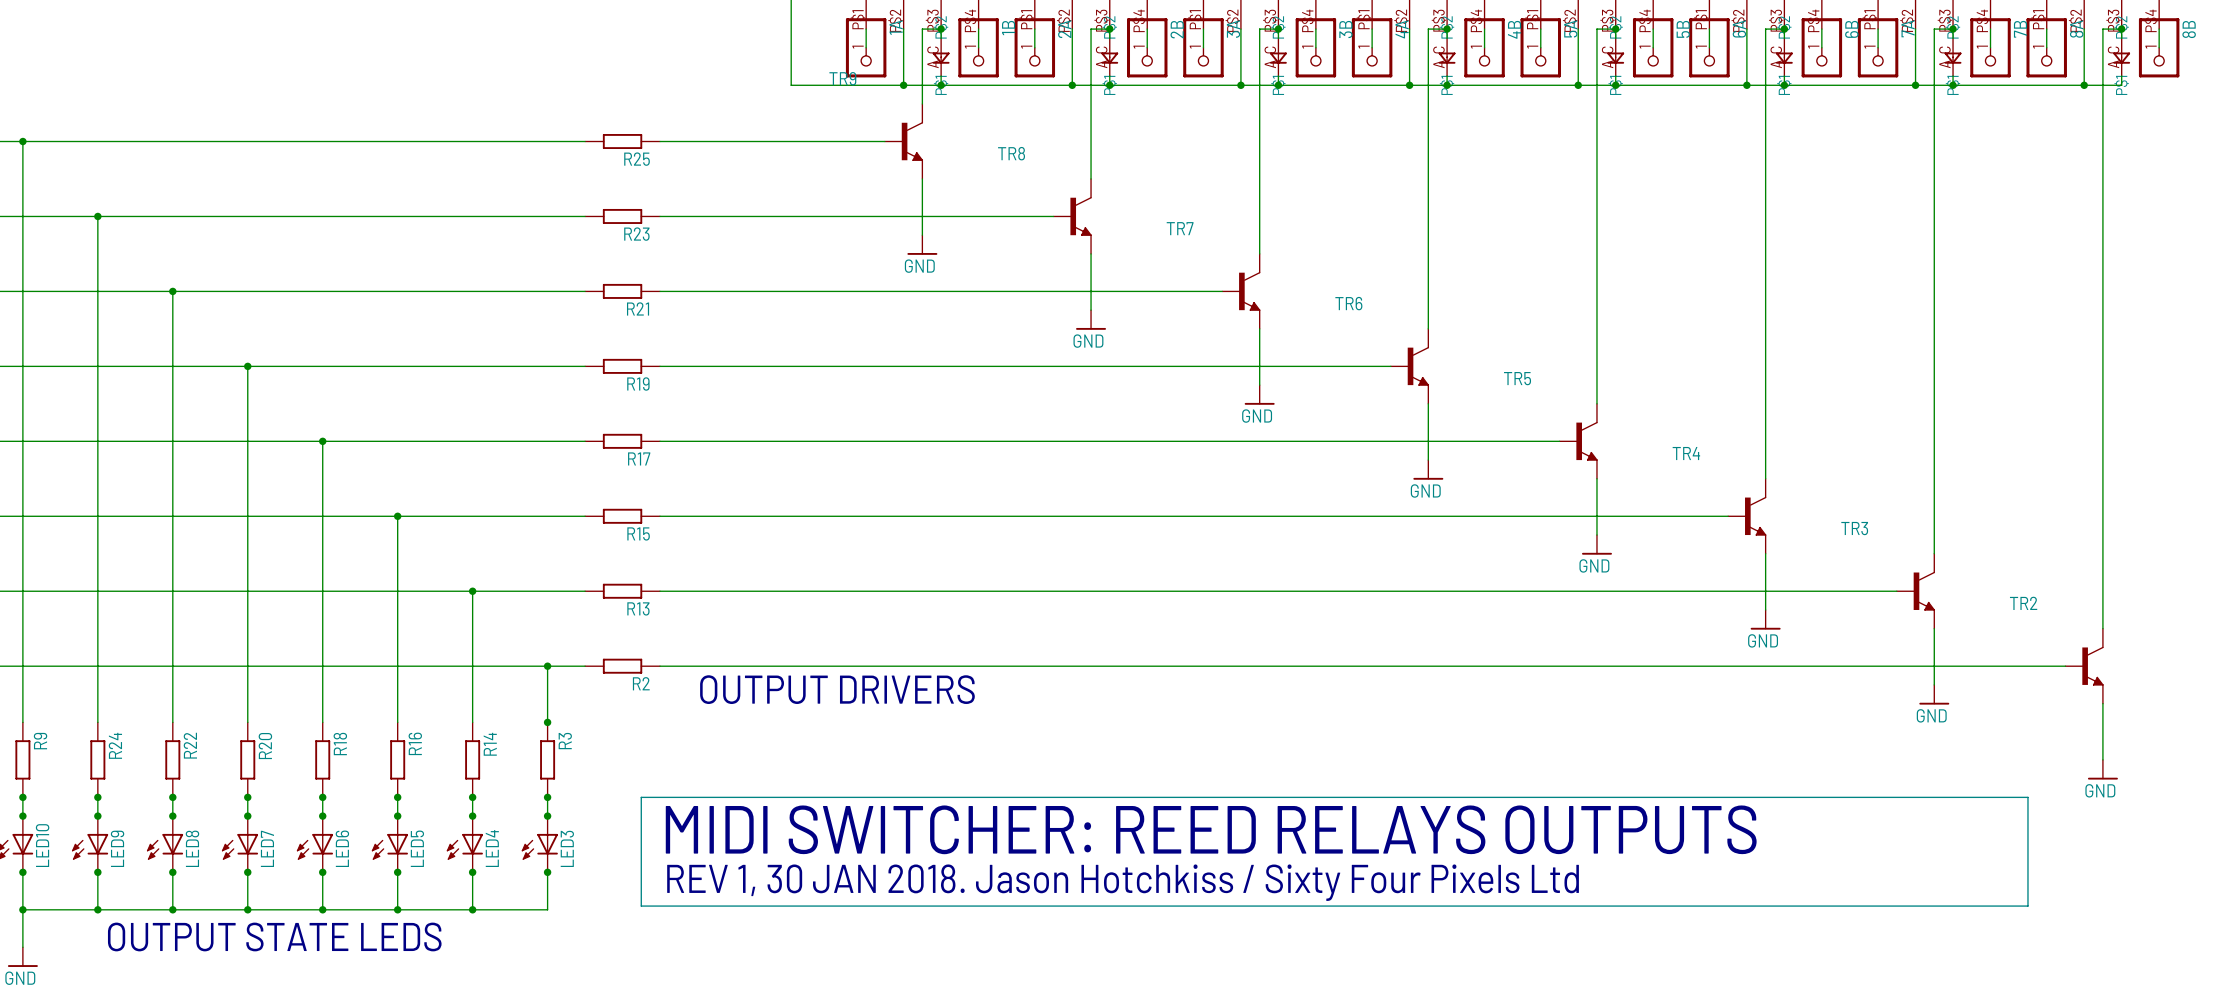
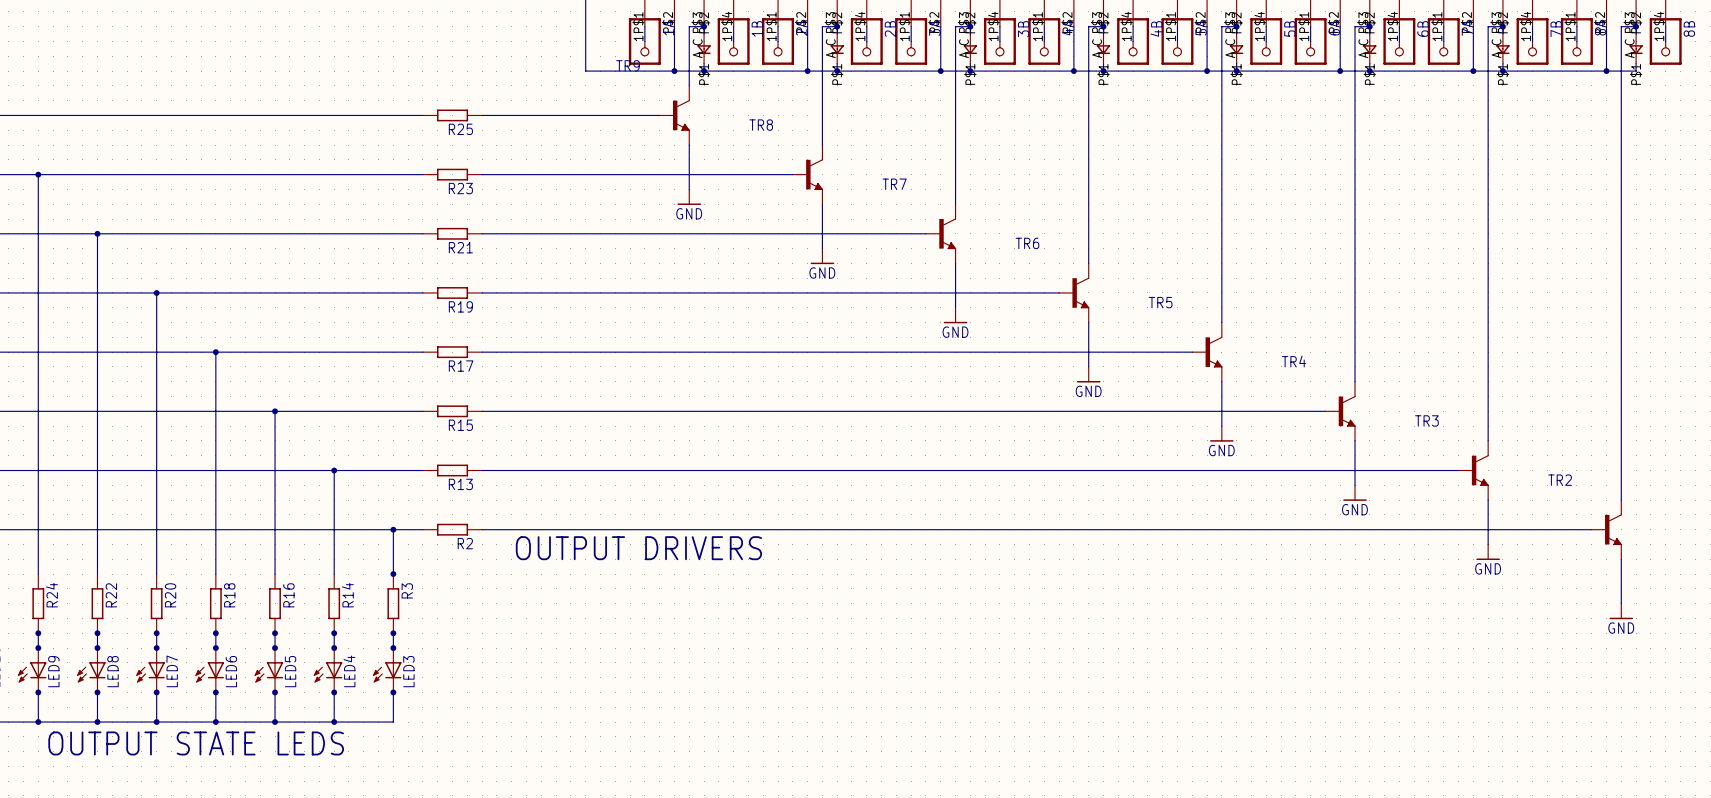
line: (641, 797) (641, 906) (2027, 906) (2027, 797) (641, 797) -> none
text: MIDI SWITCHER: REED RELAYS OUTPUTS (1211, 829) -> none
text: REV 1, 30 JAN 2018. Jason Hotchkiss / Sixty Four Pixels Ltd (1123, 882) -> none

